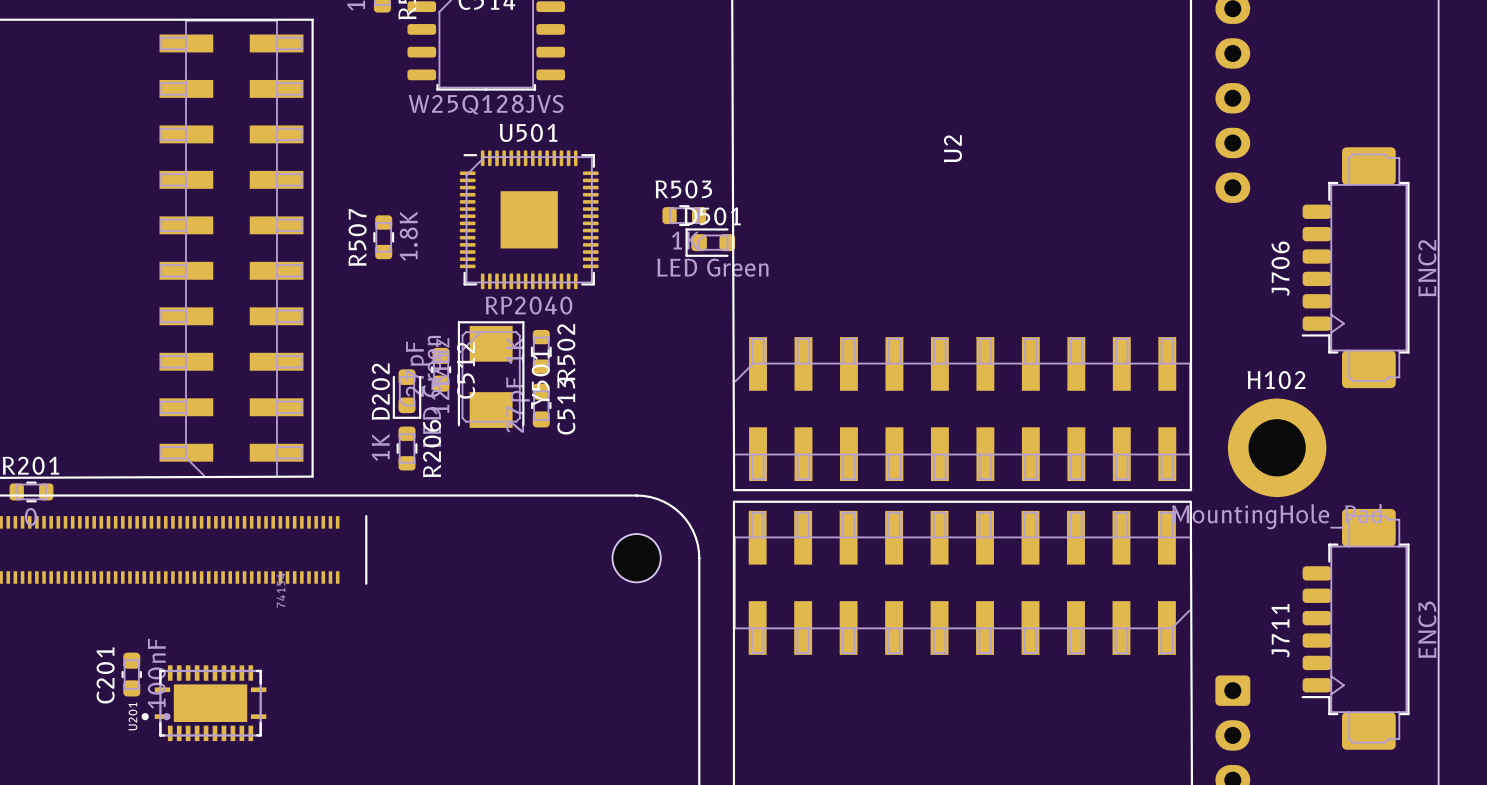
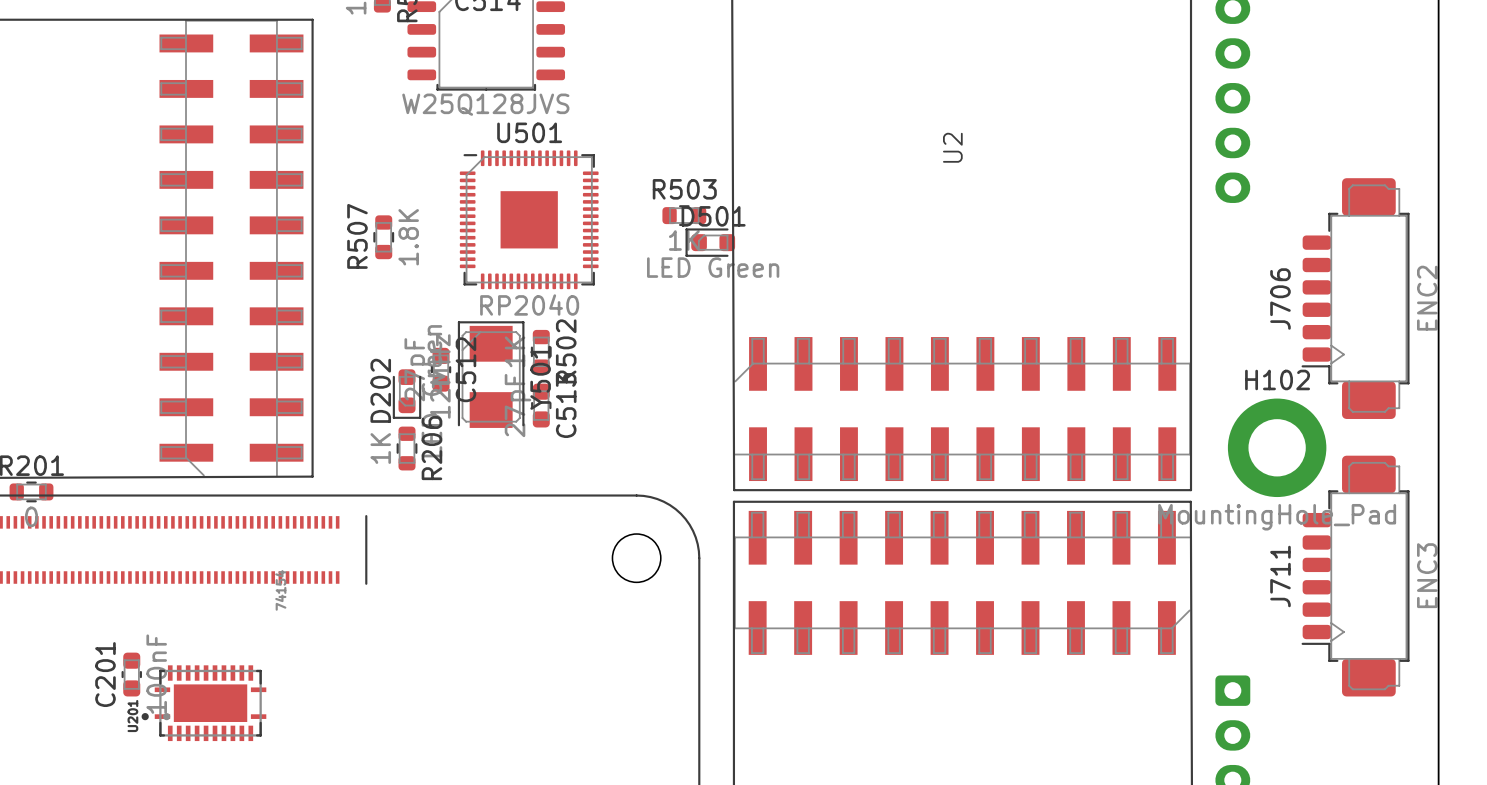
J706 position: (1355, 267) -> (1355, 298)
J711 position: (1355, 629) -> (1355, 576)

